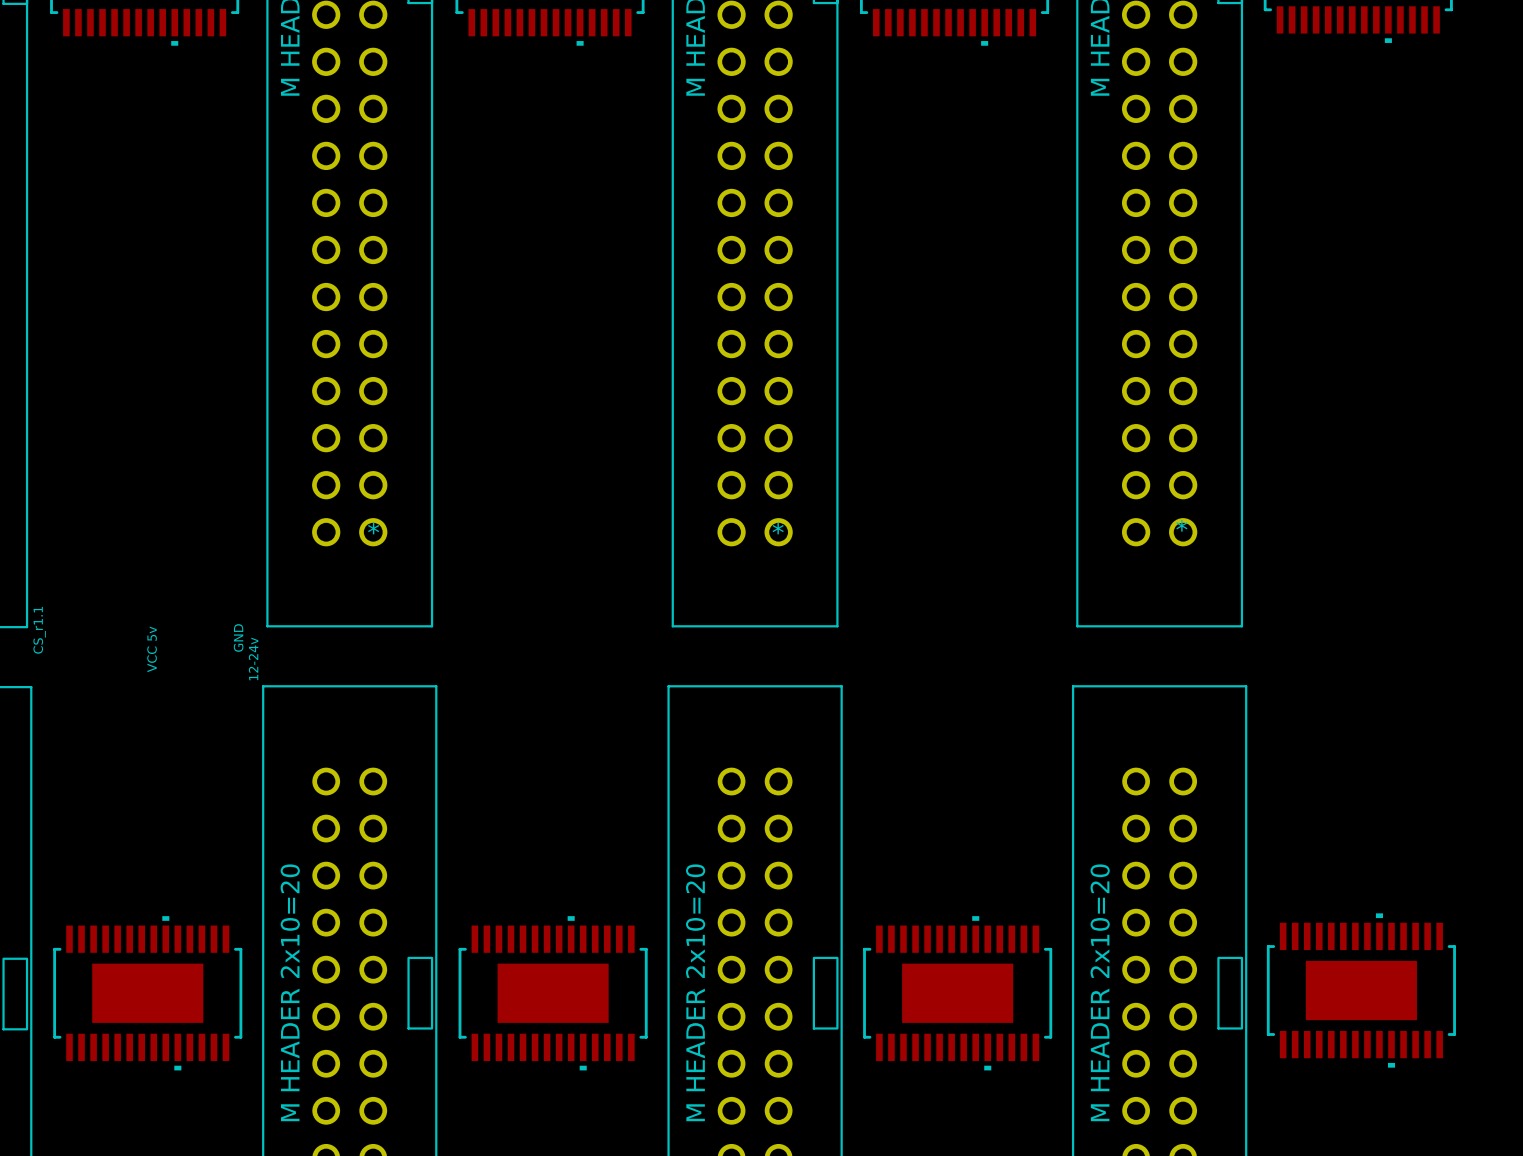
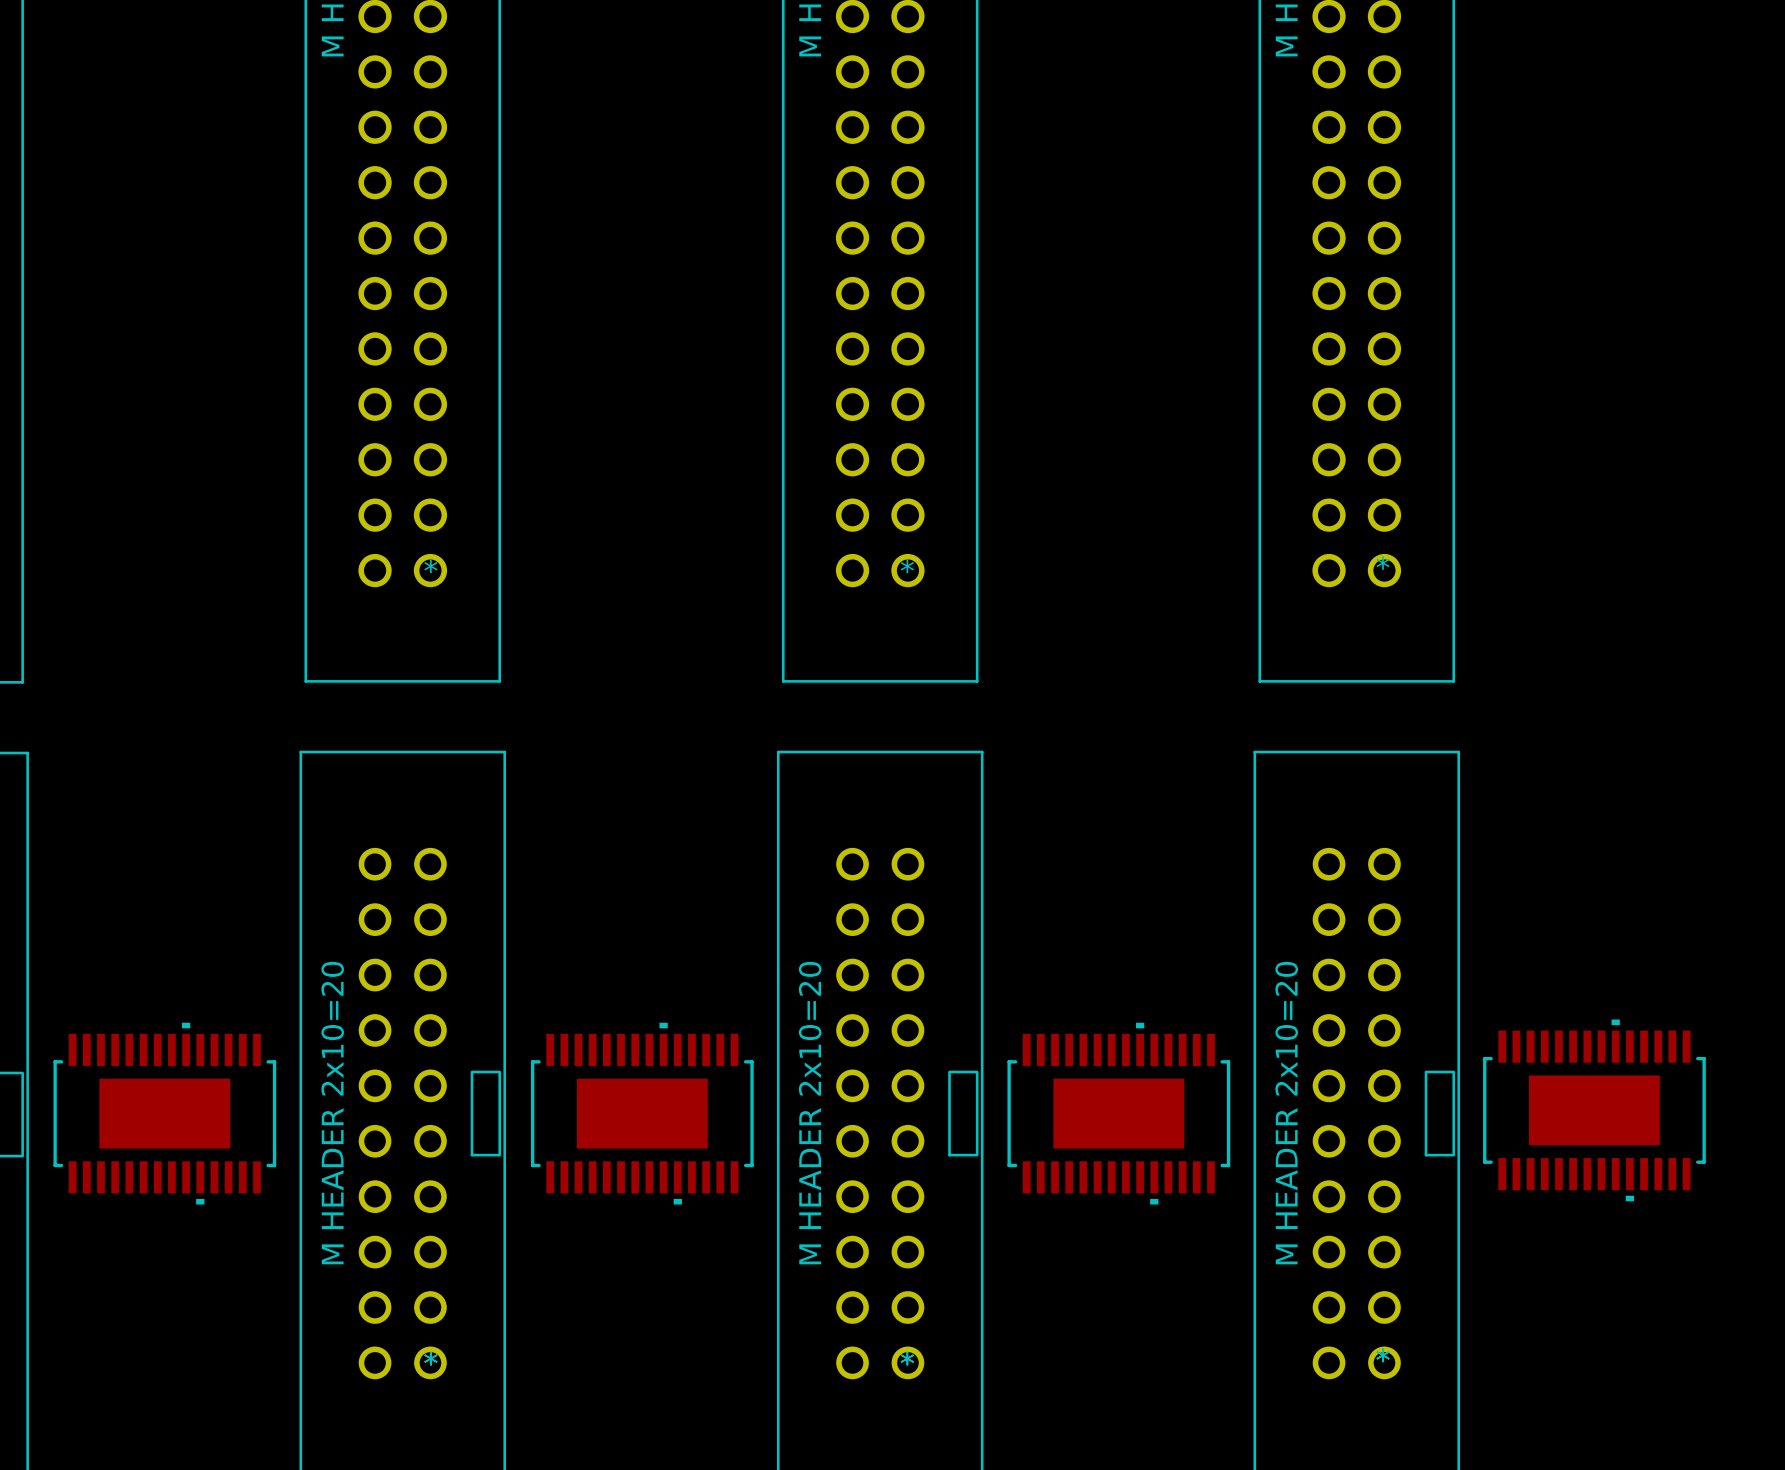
text: CS_r1.1 (39, 630) -> none
text: GND (238, 637) -> none
text: VCC 5v (152, 649) -> none
text: 12-24v (253, 658) -> none

